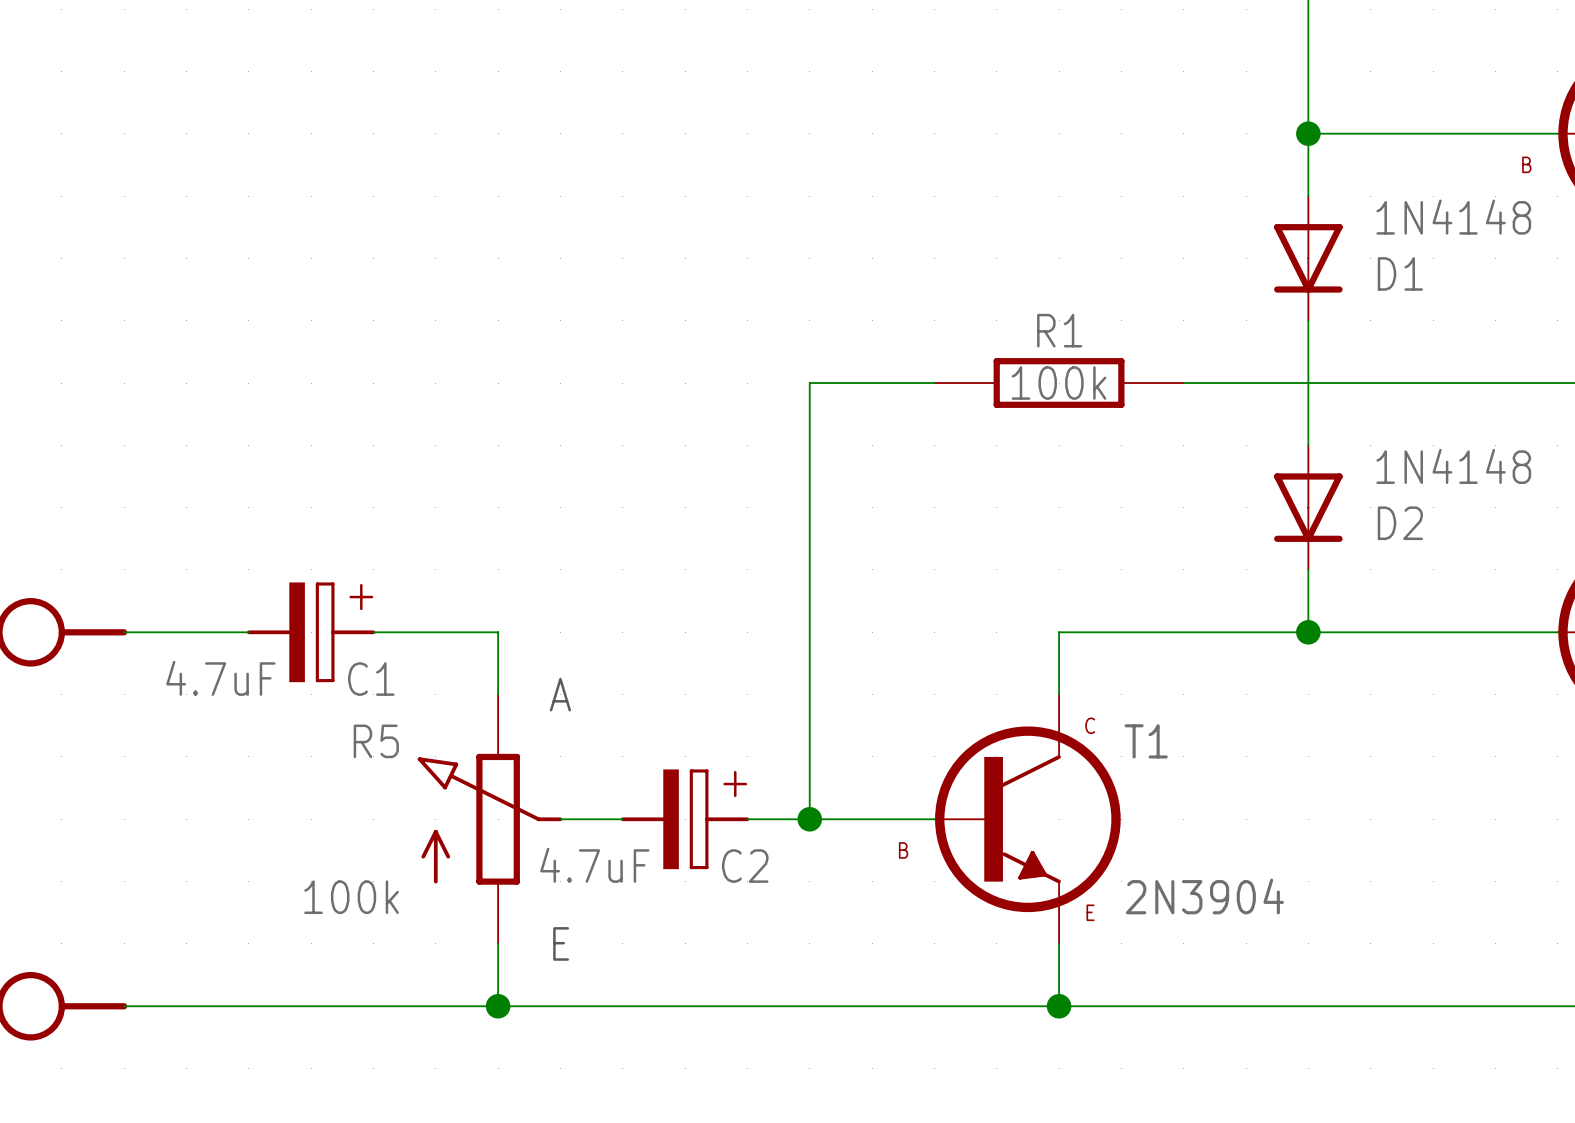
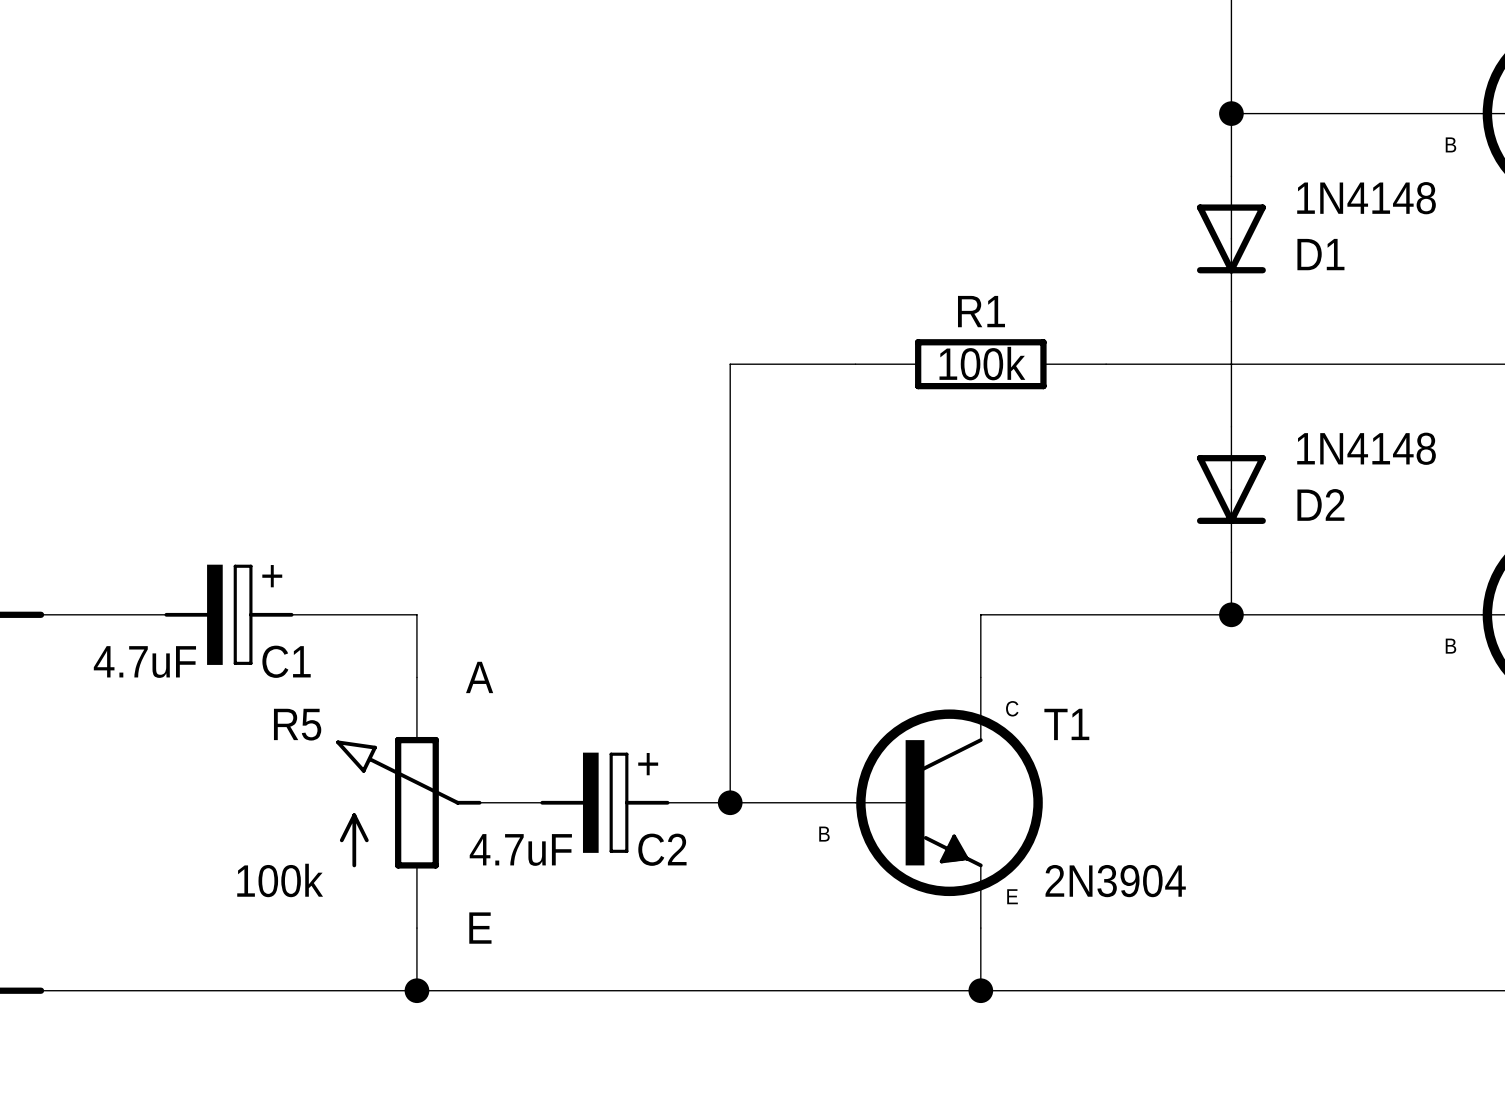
part text: none -> B (1450, 646)

